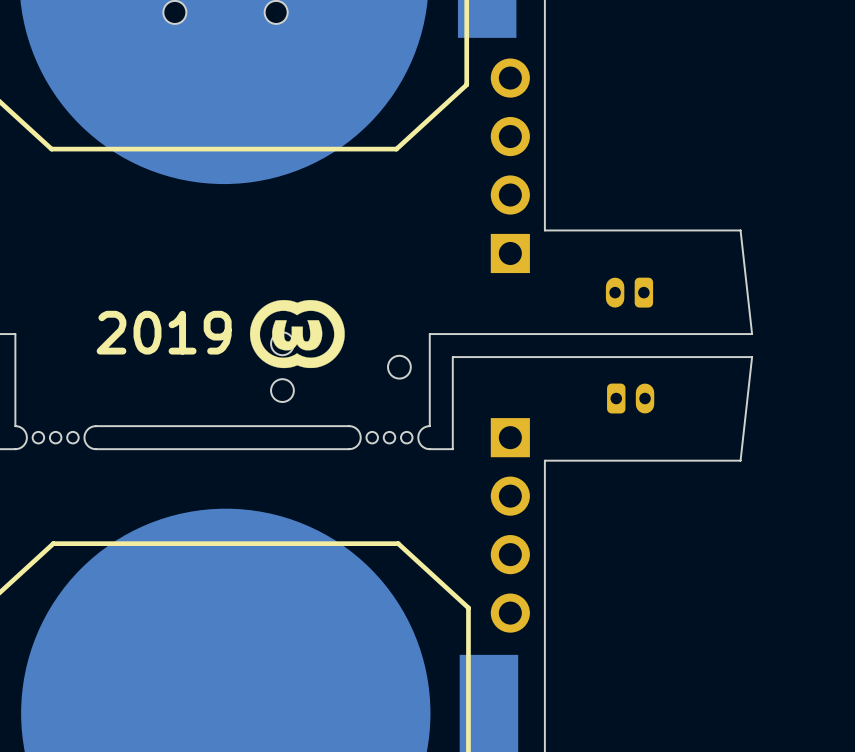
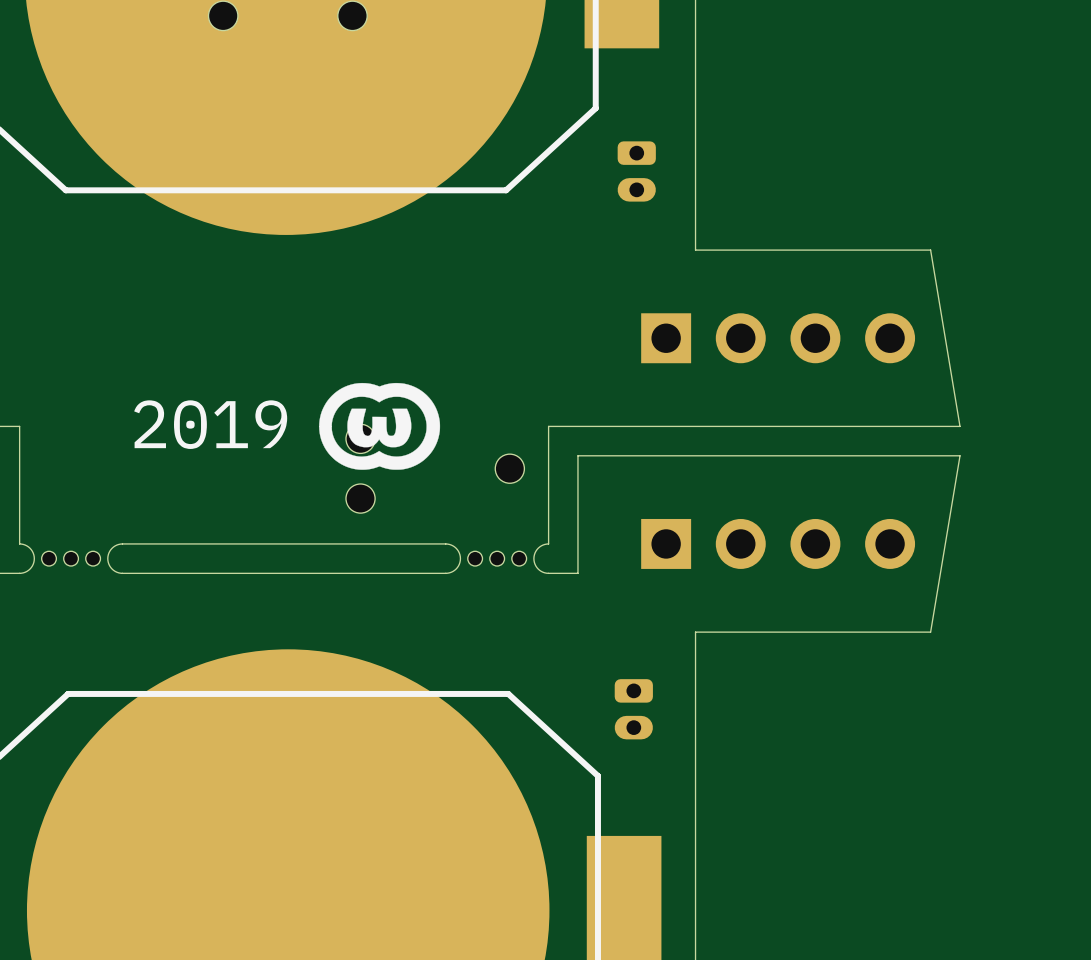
part: none -> (636, 171)
part: (510, 165) -> none
board edge: (544, 195) (544, 230) (740, 230) (752, 334) -> (695, 250) (930, 250) (960, 426)
part: none -> (778, 338)
part: (629, 292) -> none
board edge: (752, 357) (740, 460) (544, 460) (544, 495) -> (960, 455) (930, 632) (695, 632)
part: (630, 398) -> none
part: none -> (778, 543)
part: (510, 525) -> none
part: none -> (633, 709)

